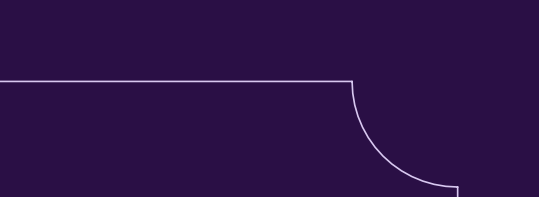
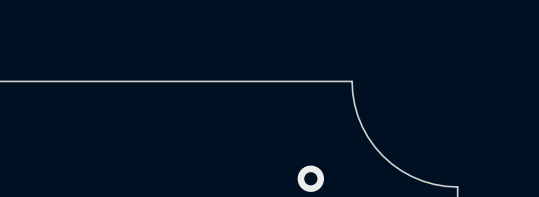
via: none -> (310, 178)

